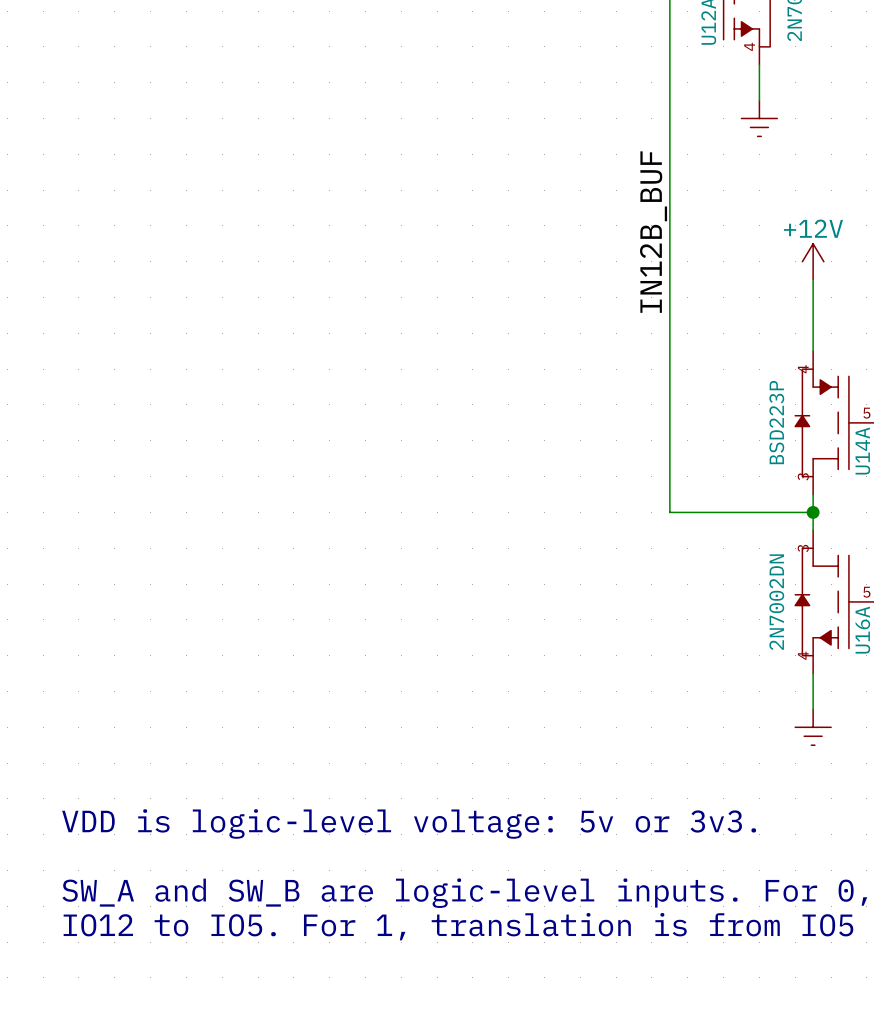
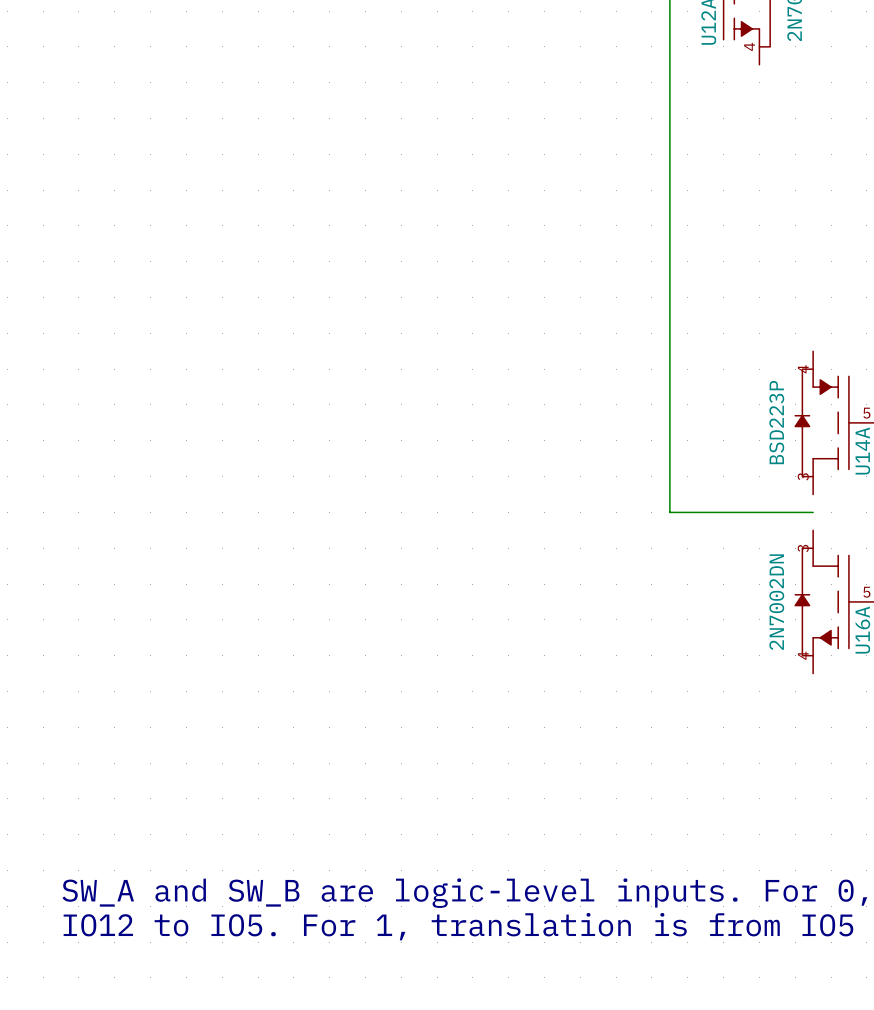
wire: (759, 64) (759, 100) -> none
power symbol: (759, 118) -> none
label: IN12B_BUF (653, 232) -> none
power symbol: +12V (813, 261) -> none
wire: (813, 279) (813, 351) -> none
wire: (813, 494) (813, 530) -> none
junction: (813, 512) -> none
wire: (813, 673) (813, 709) -> none
power symbol: (813, 727) -> none
text: VDD is logic-level voltage: 5v or 3v3. (409, 823) -> none

